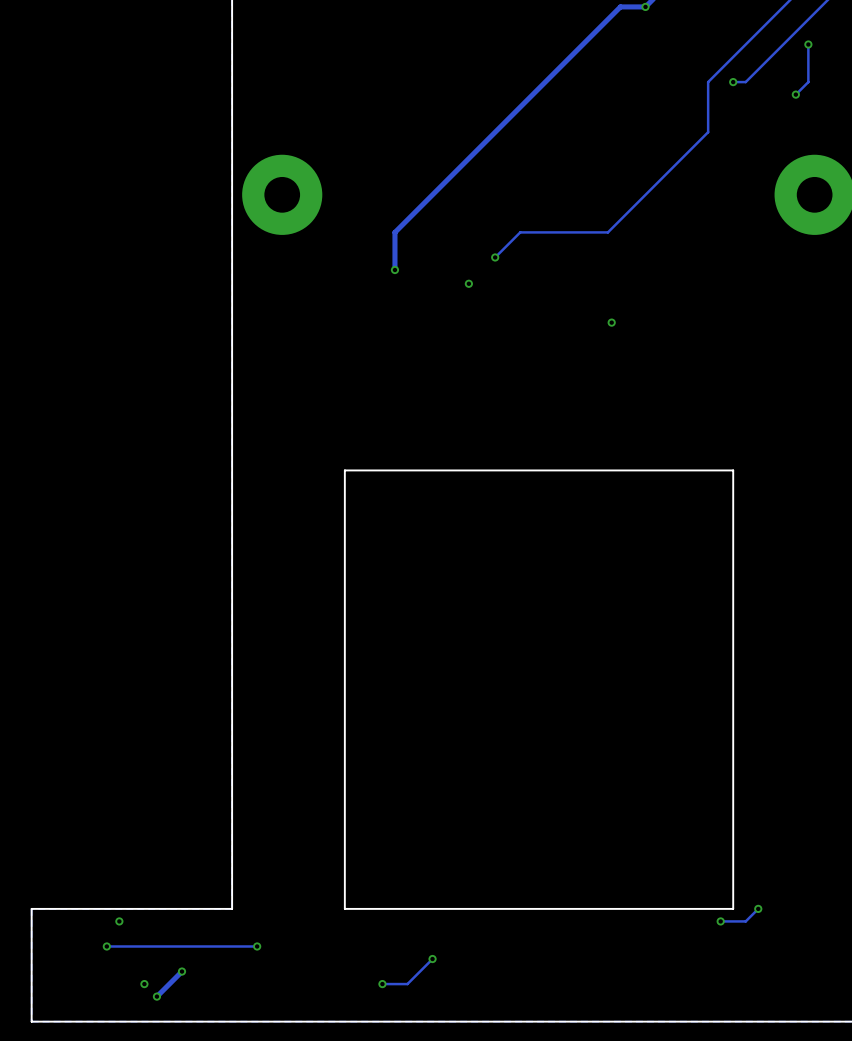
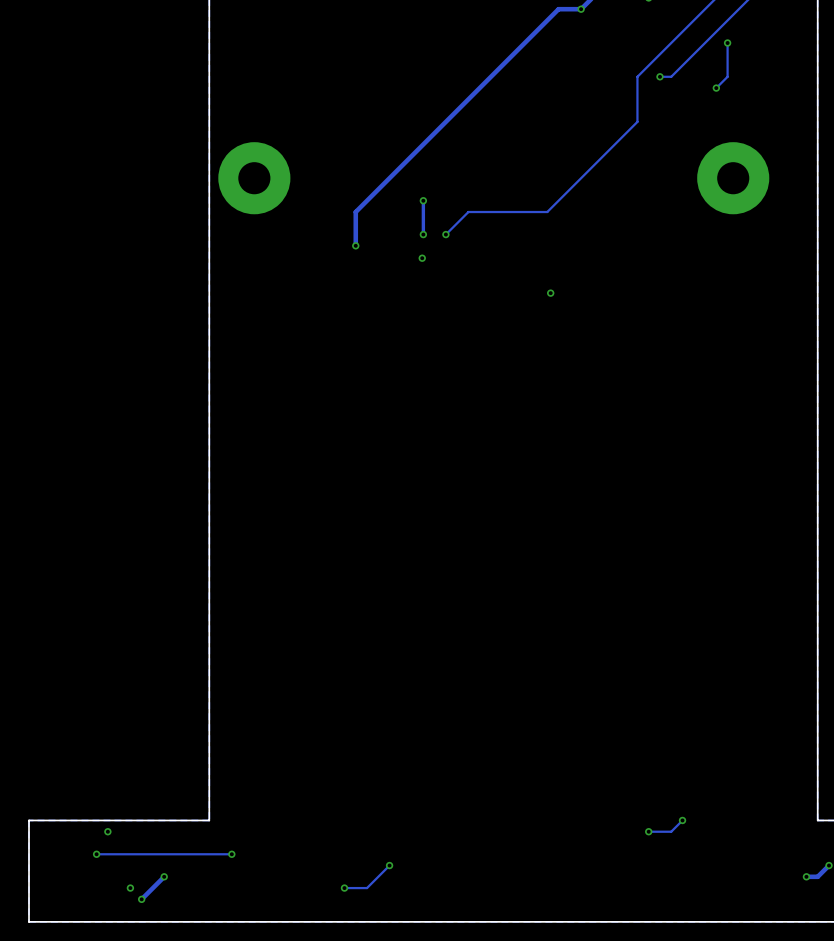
track: none -> (423, 200) (423, 234)
via: none -> (423, 200)
via: none -> (423, 234)
board edge: (733, 470) (344, 470) (344, 908) (733, 908) (733, 470) -> none

